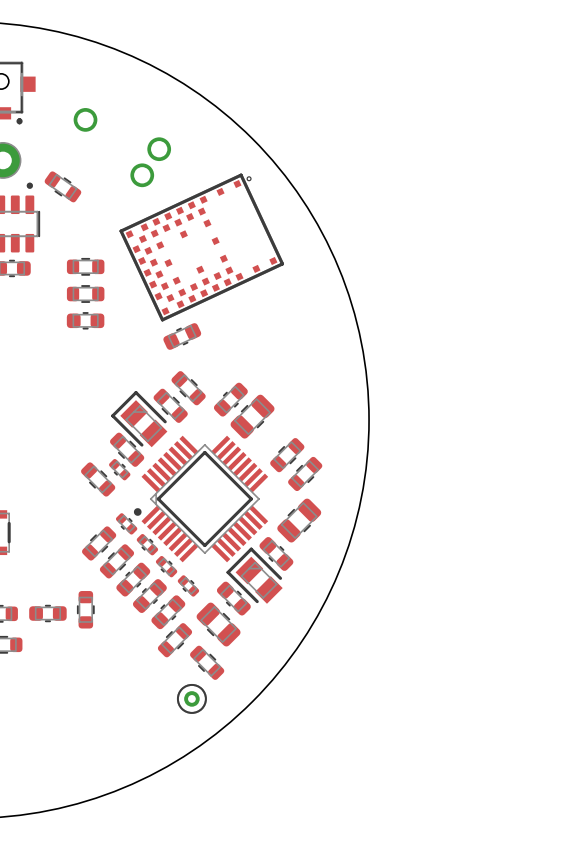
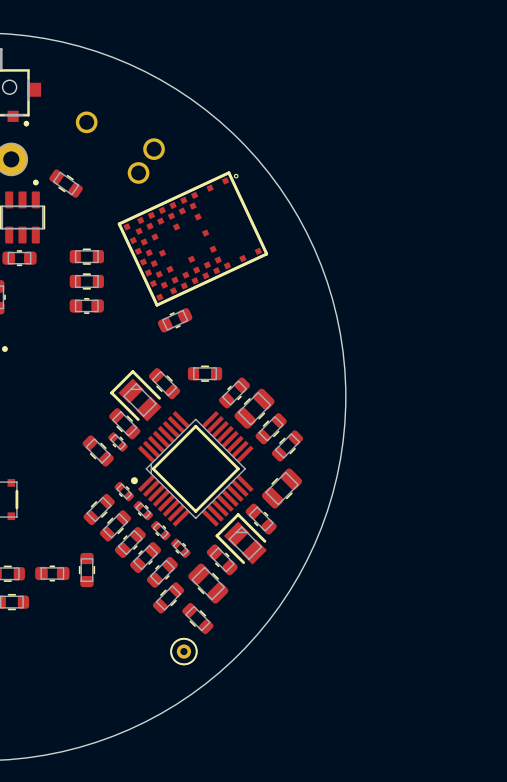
part: (188, 388) -> none
part: none -> (205, 373)
part footprint: [230, 394, 275, 439] -> [218, 377, 251, 409]
part: (230, 399) -> none
part: none -> (254, 408)

